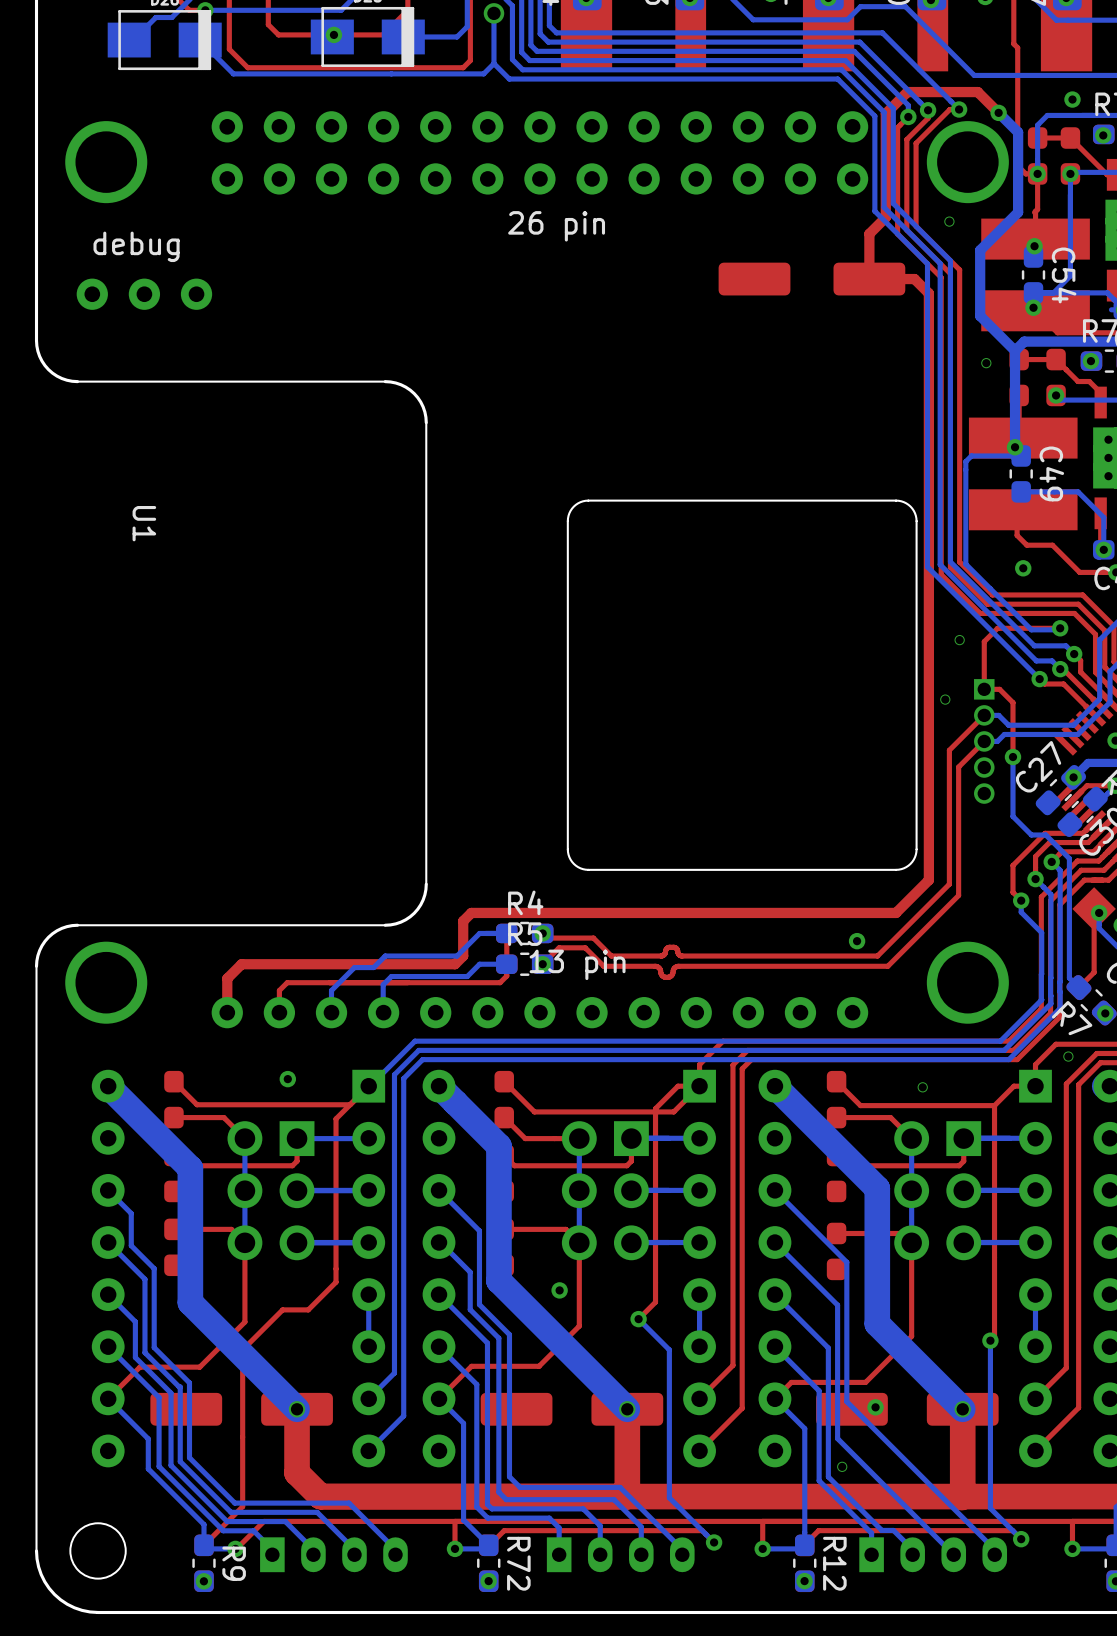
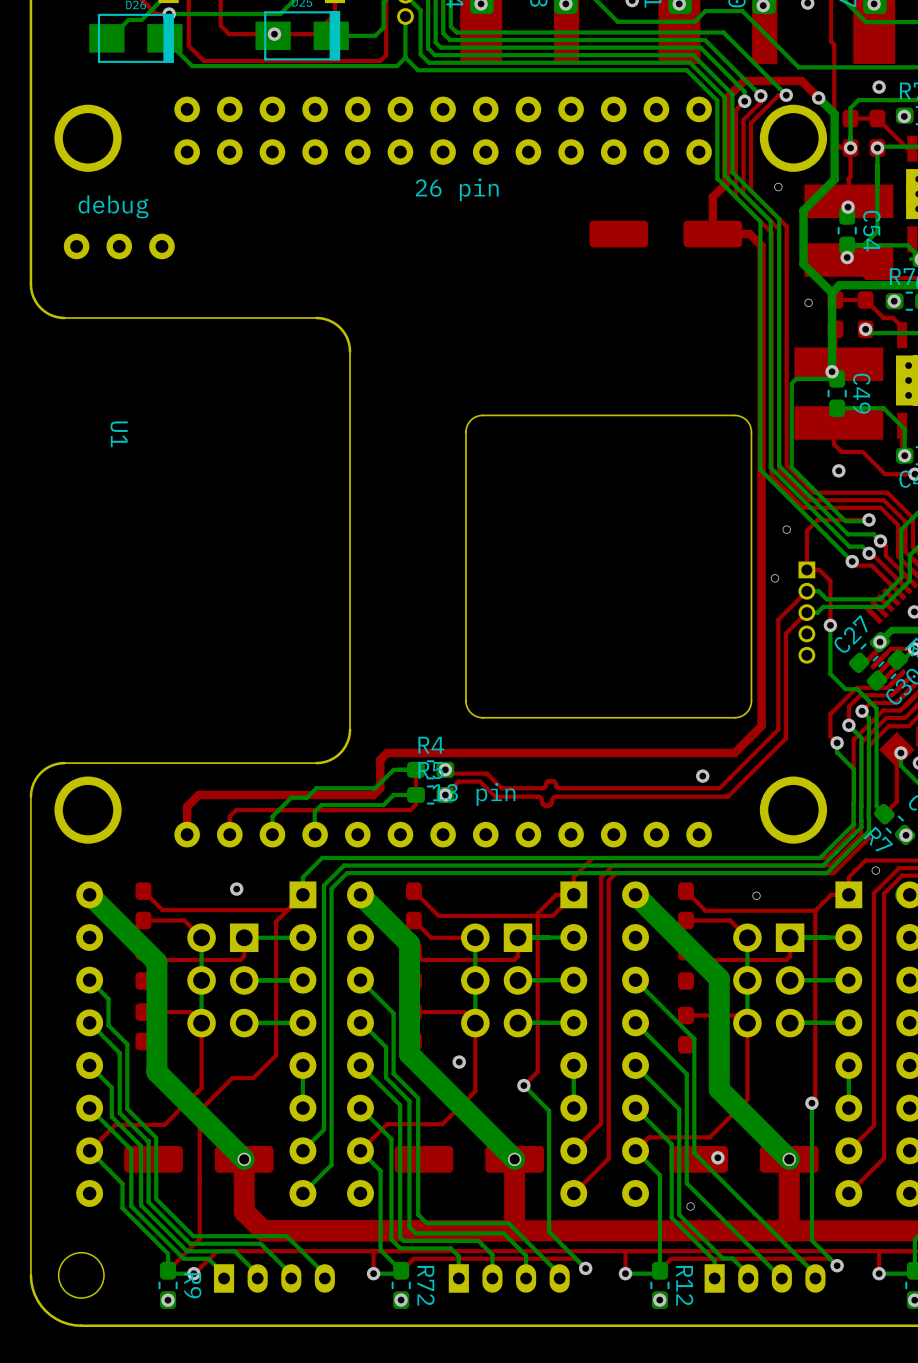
bottom track: (414, 1041) (368, 1086) -> (340, 857) (322, 857) (302, 877) (302, 894)

